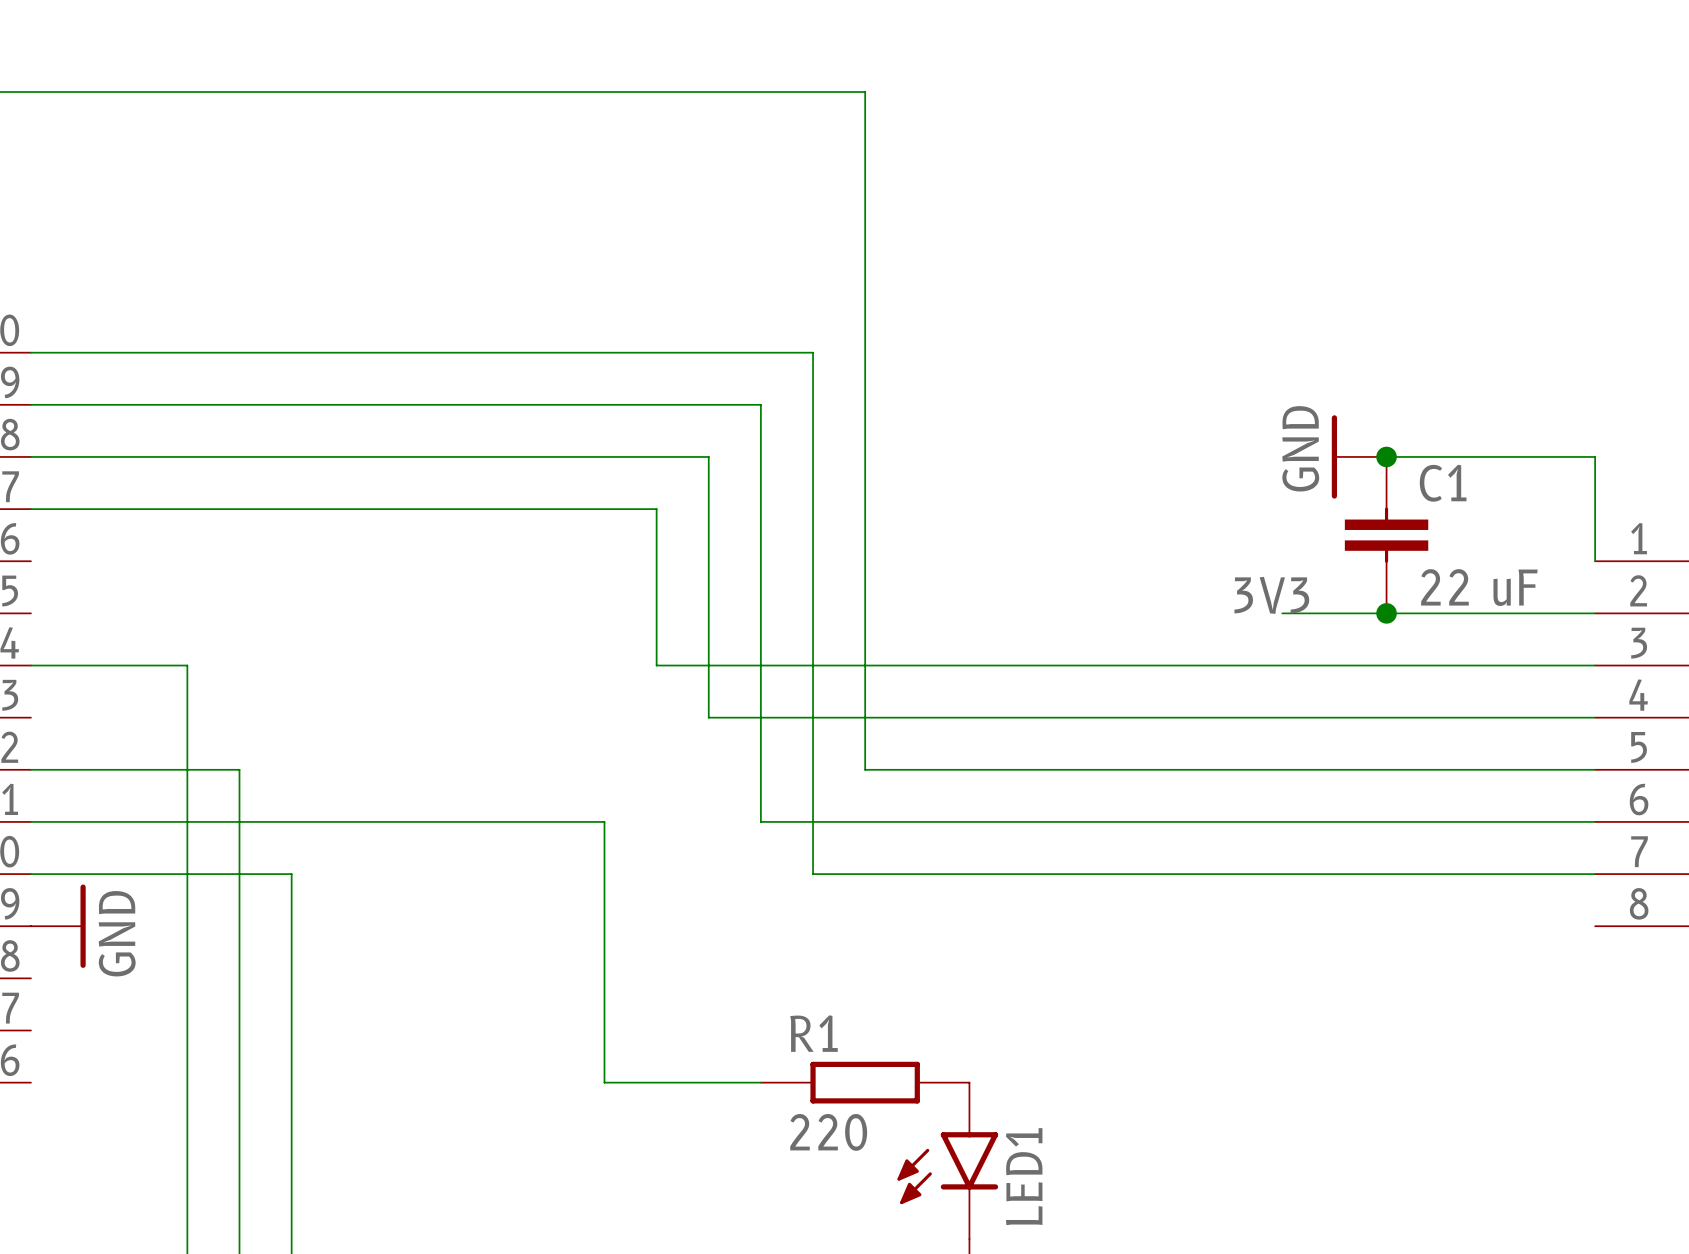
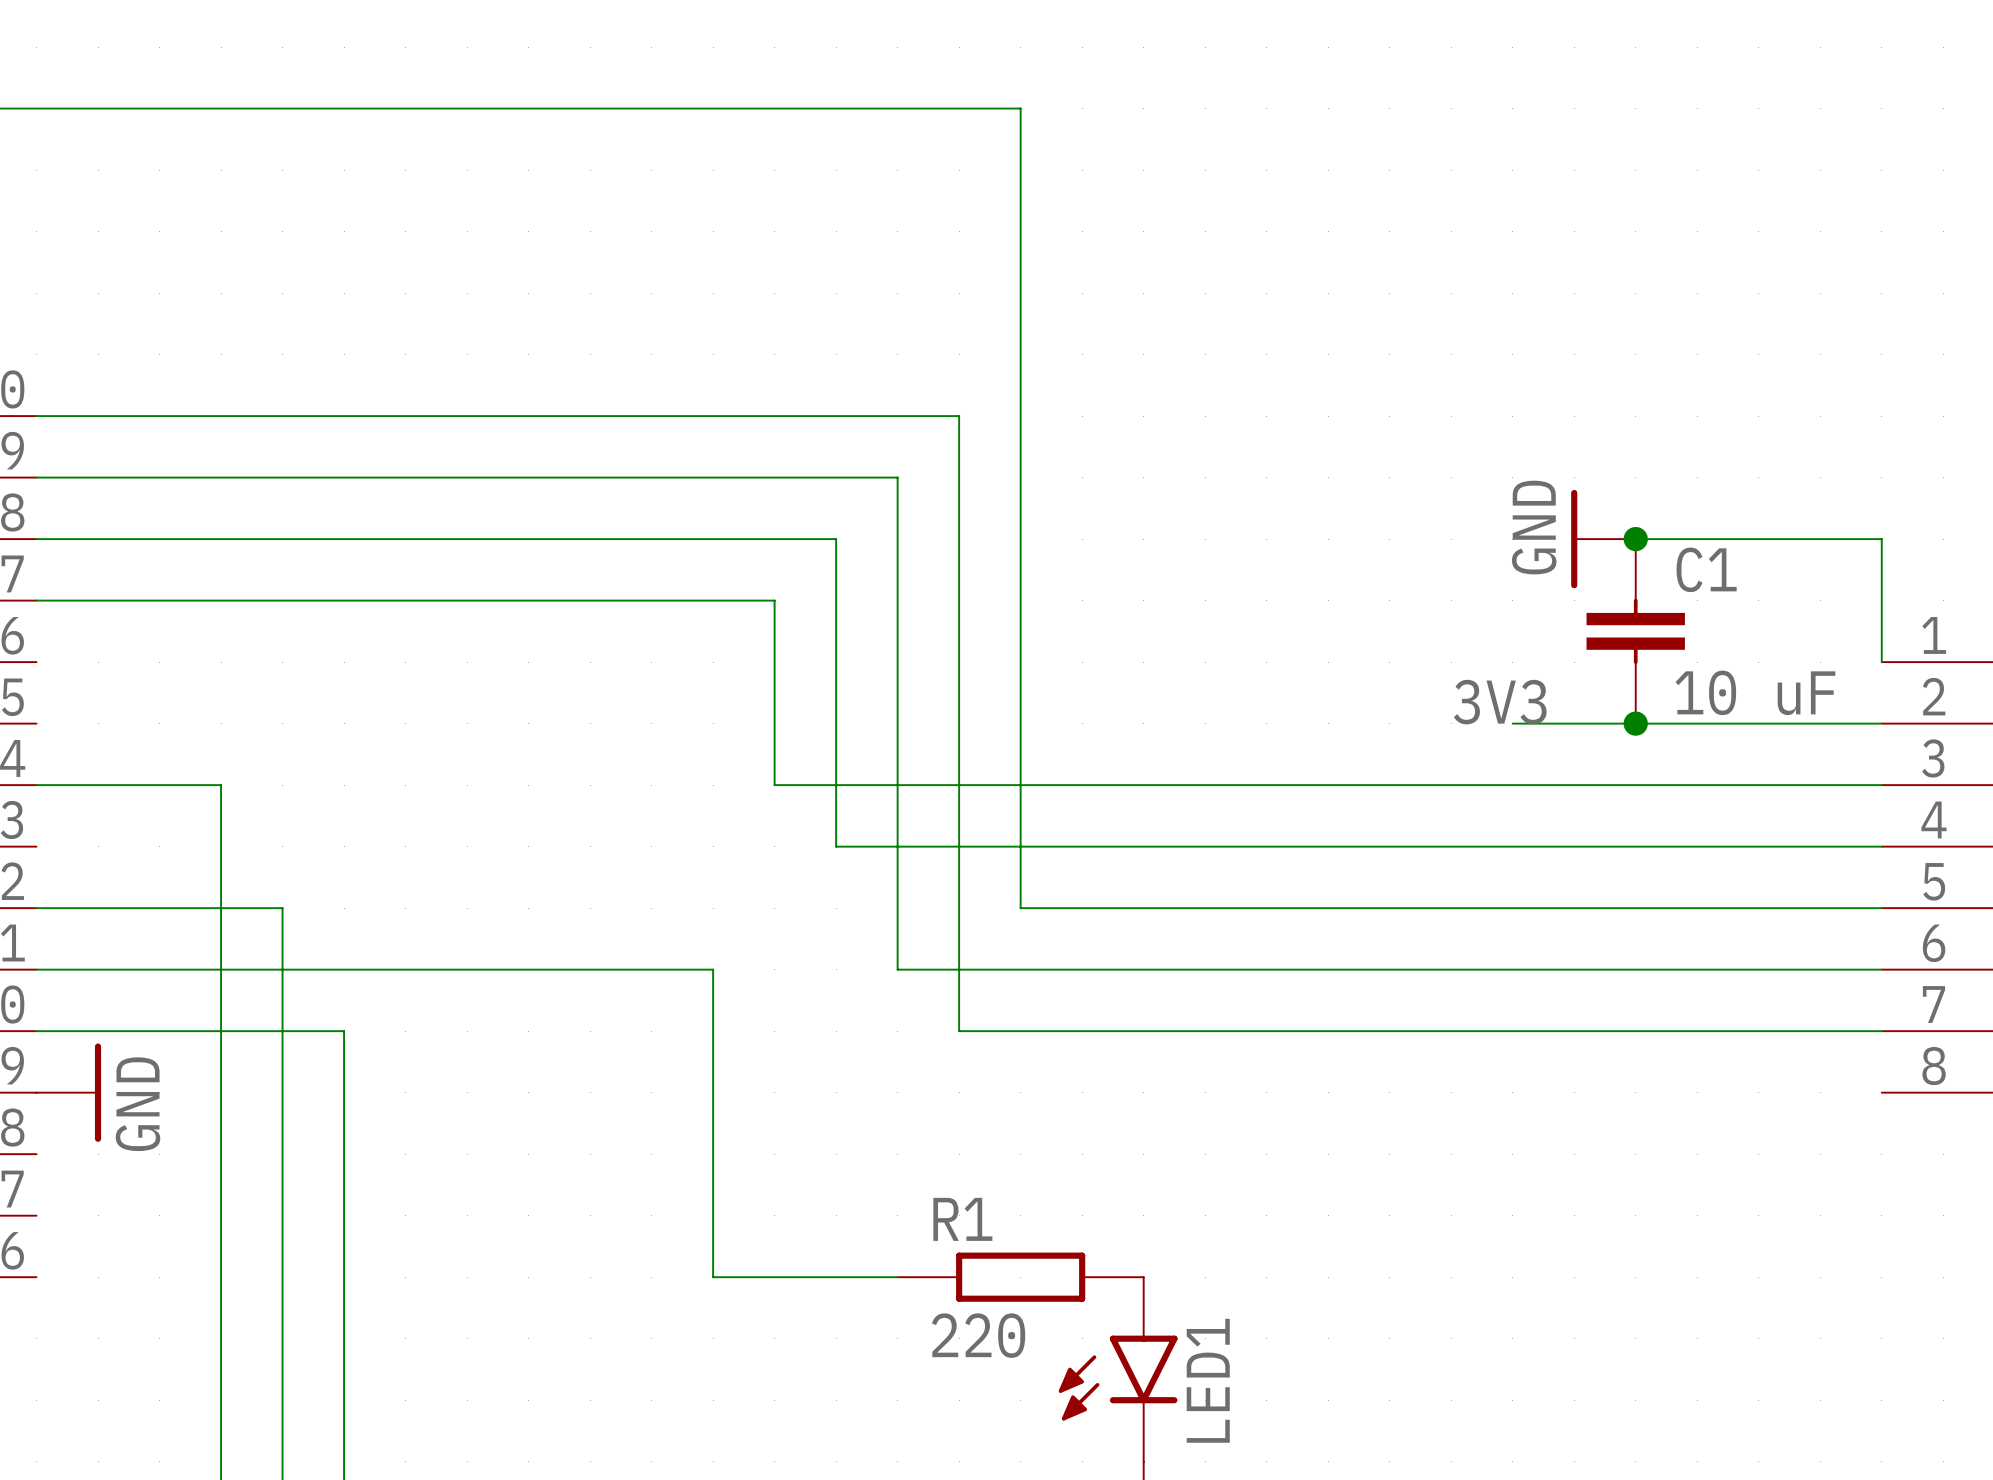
C1 value: 22 uF (1479, 587) -> 10 uF (1755, 692)

